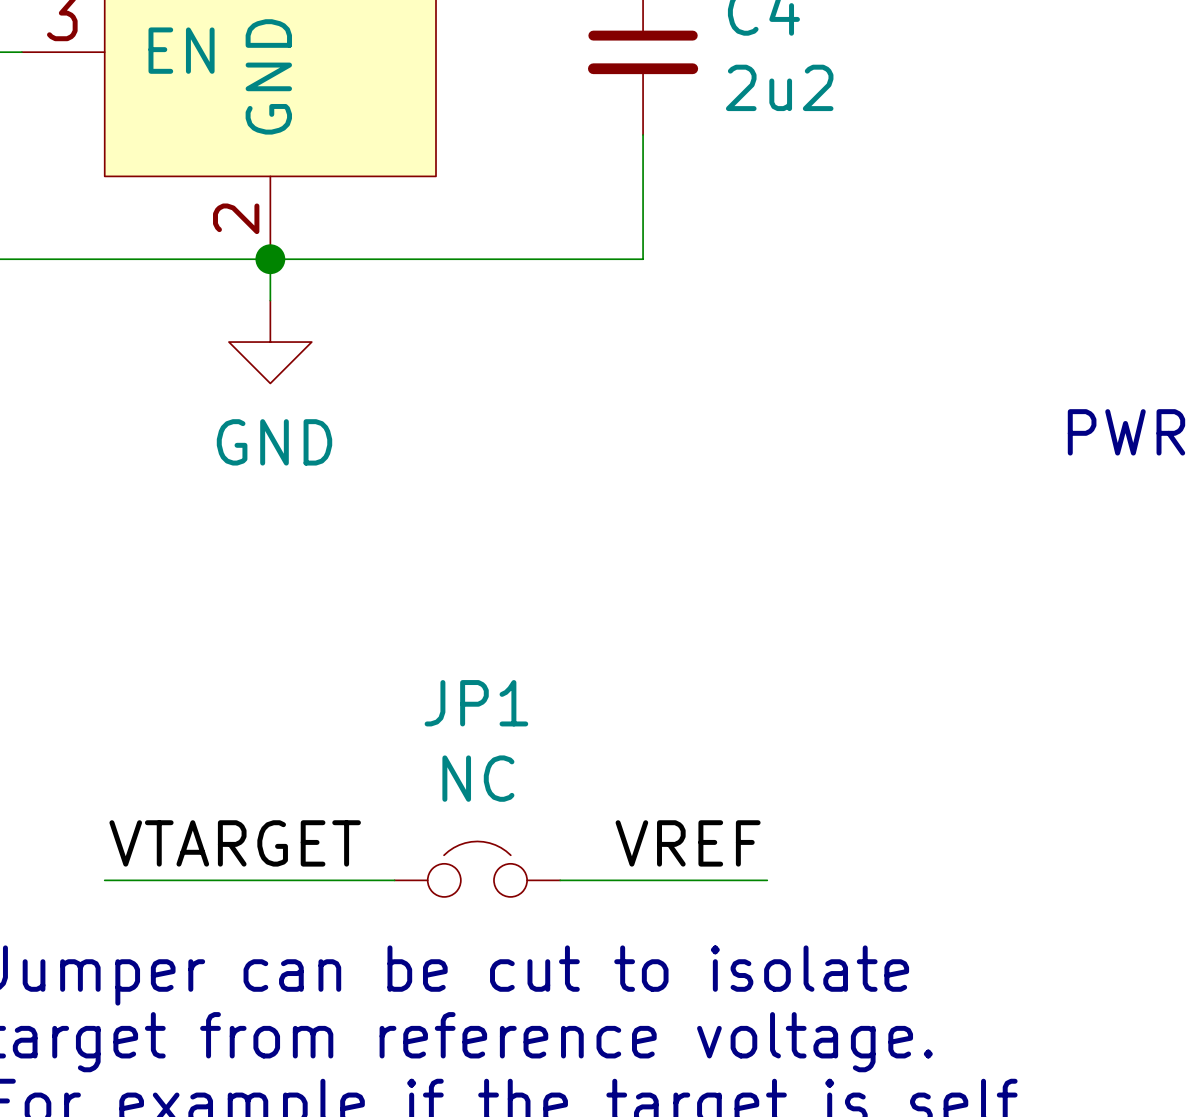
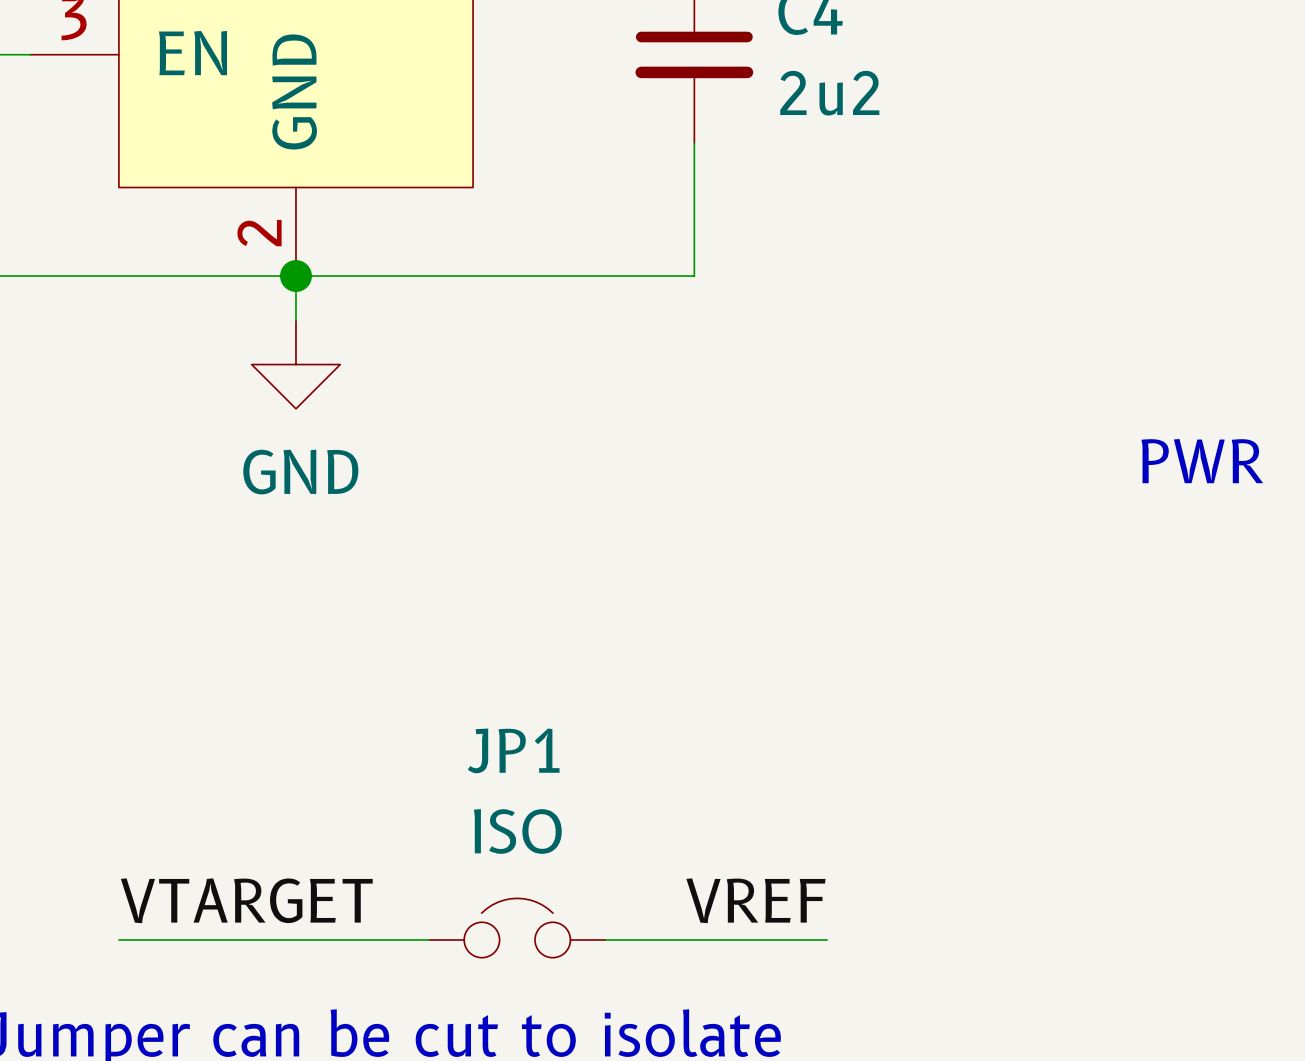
JP1 value: NC (478, 778) -> ISO (517, 831)

